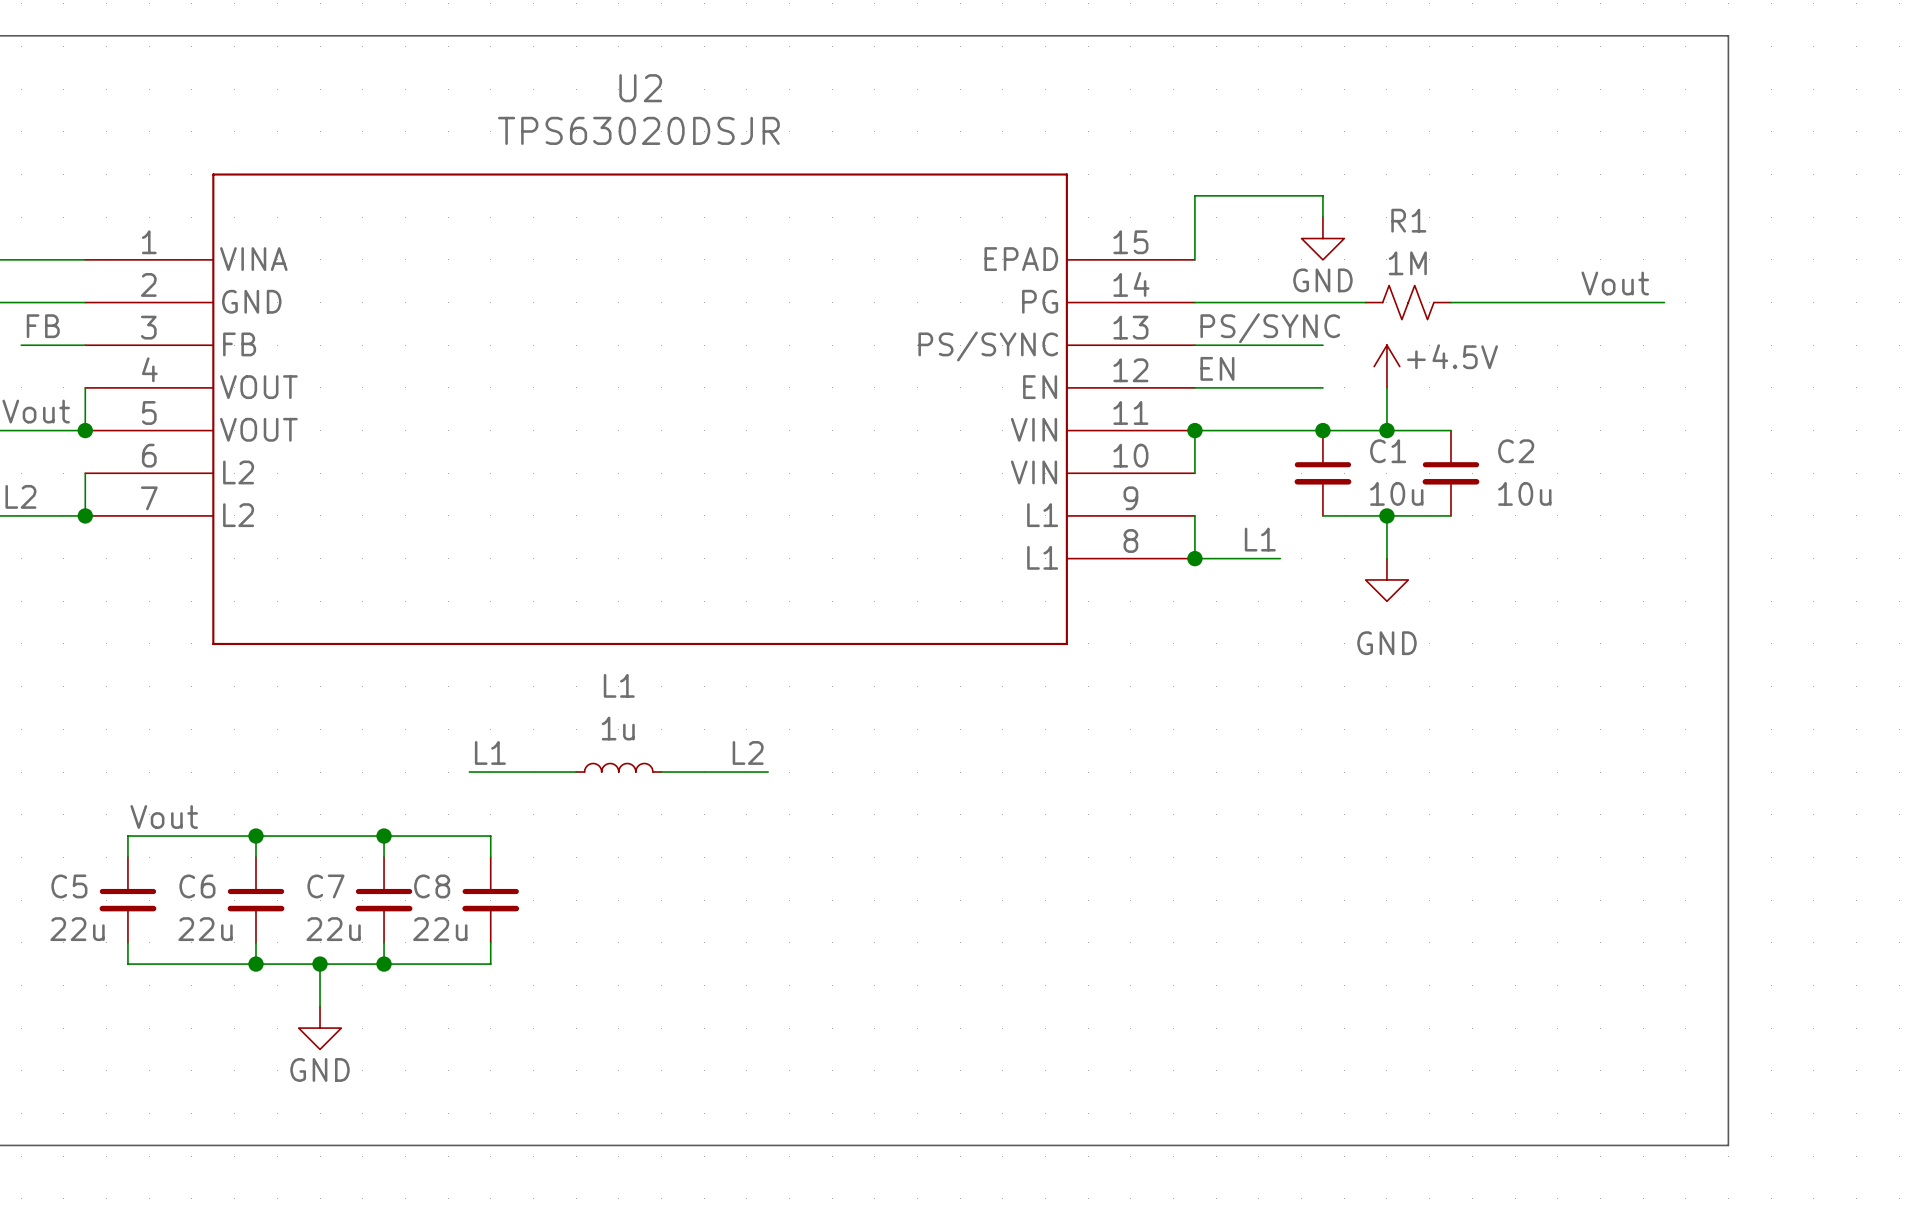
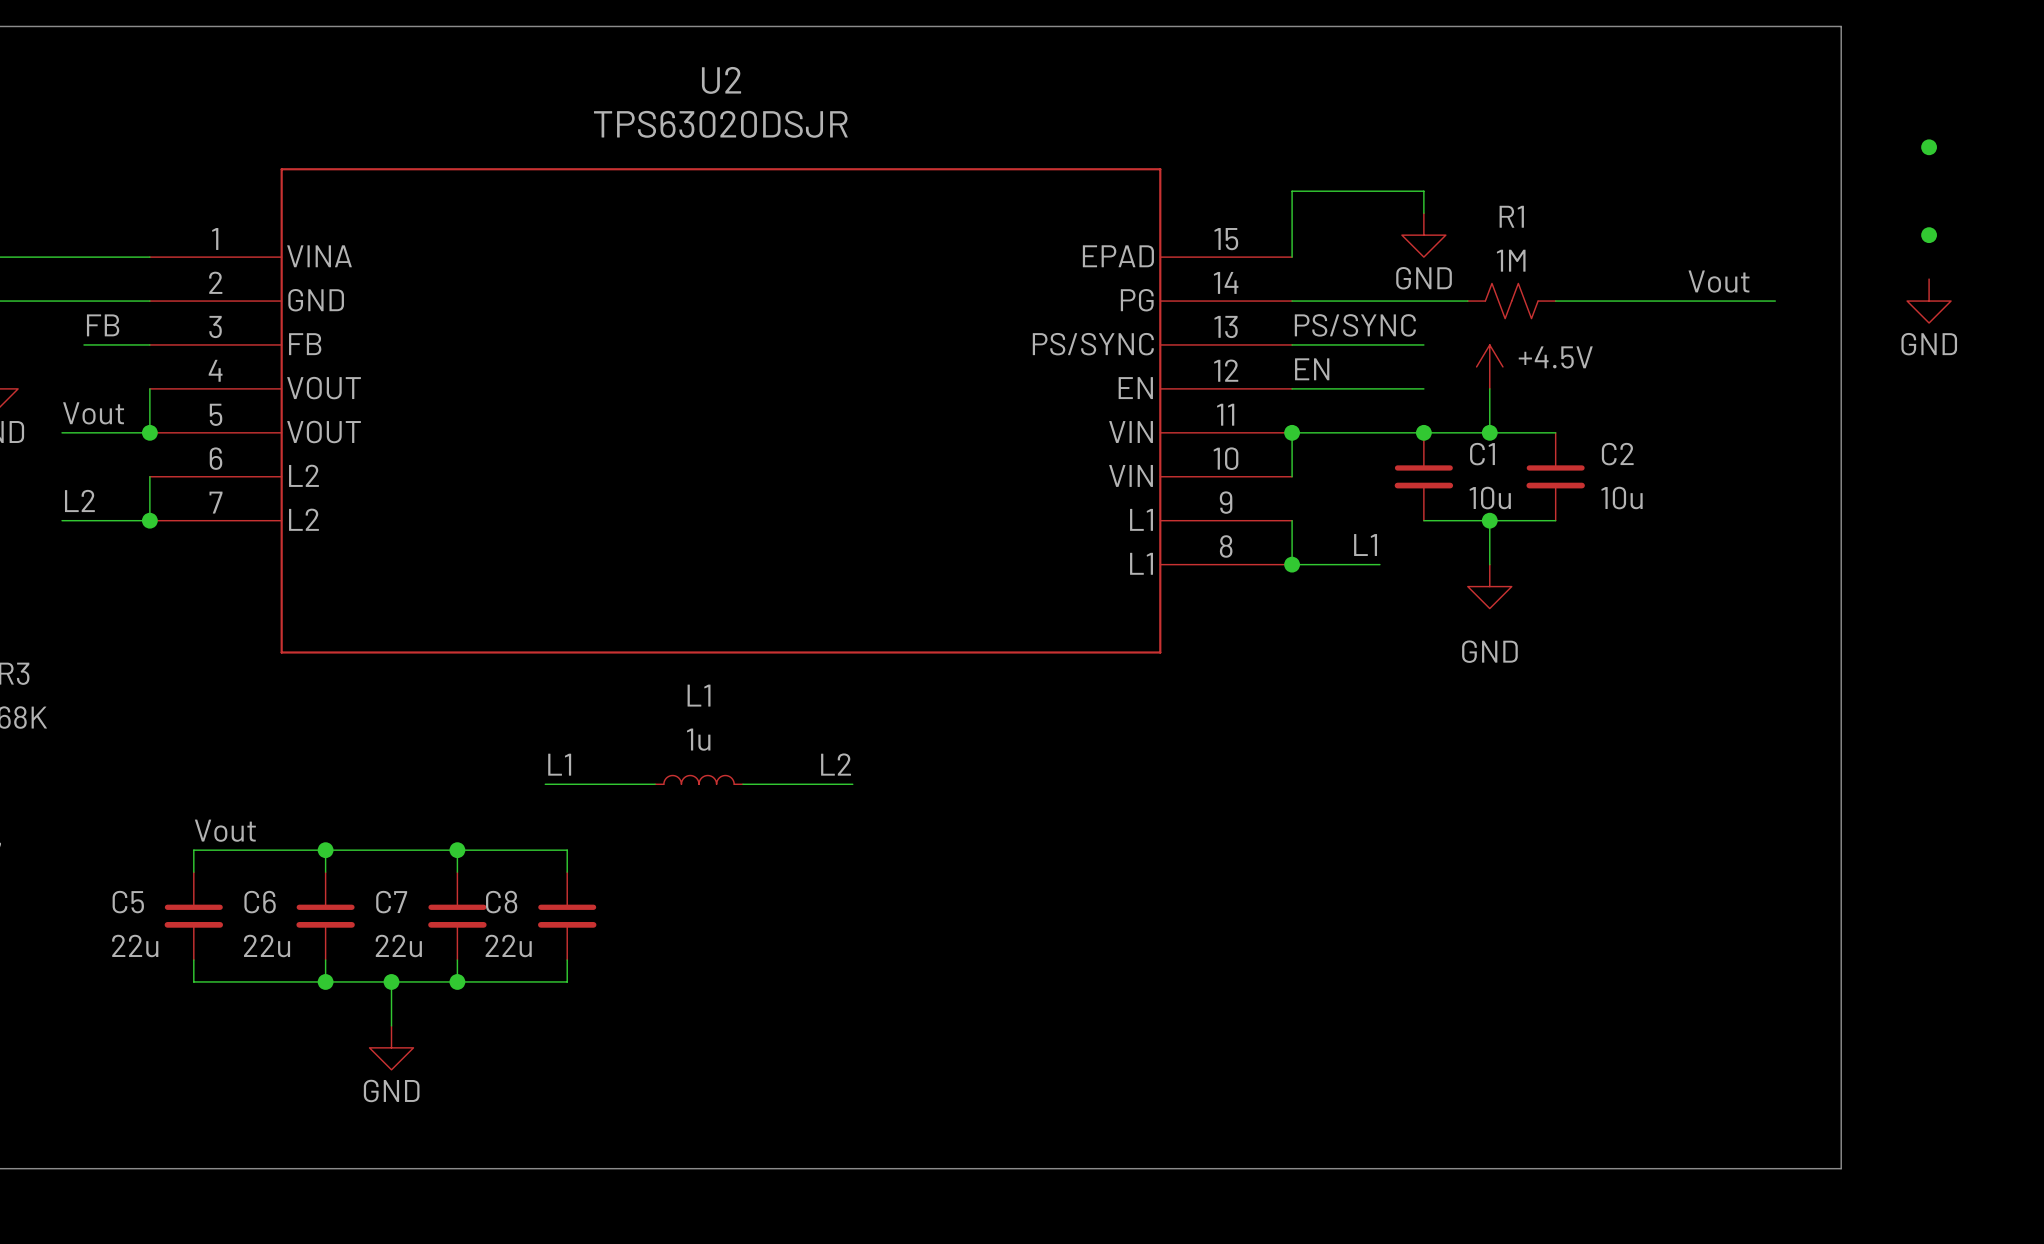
junction: none -> (1929, 147)
junction: none -> (1929, 235)
power symbol: none -> GND (1929, 301)

